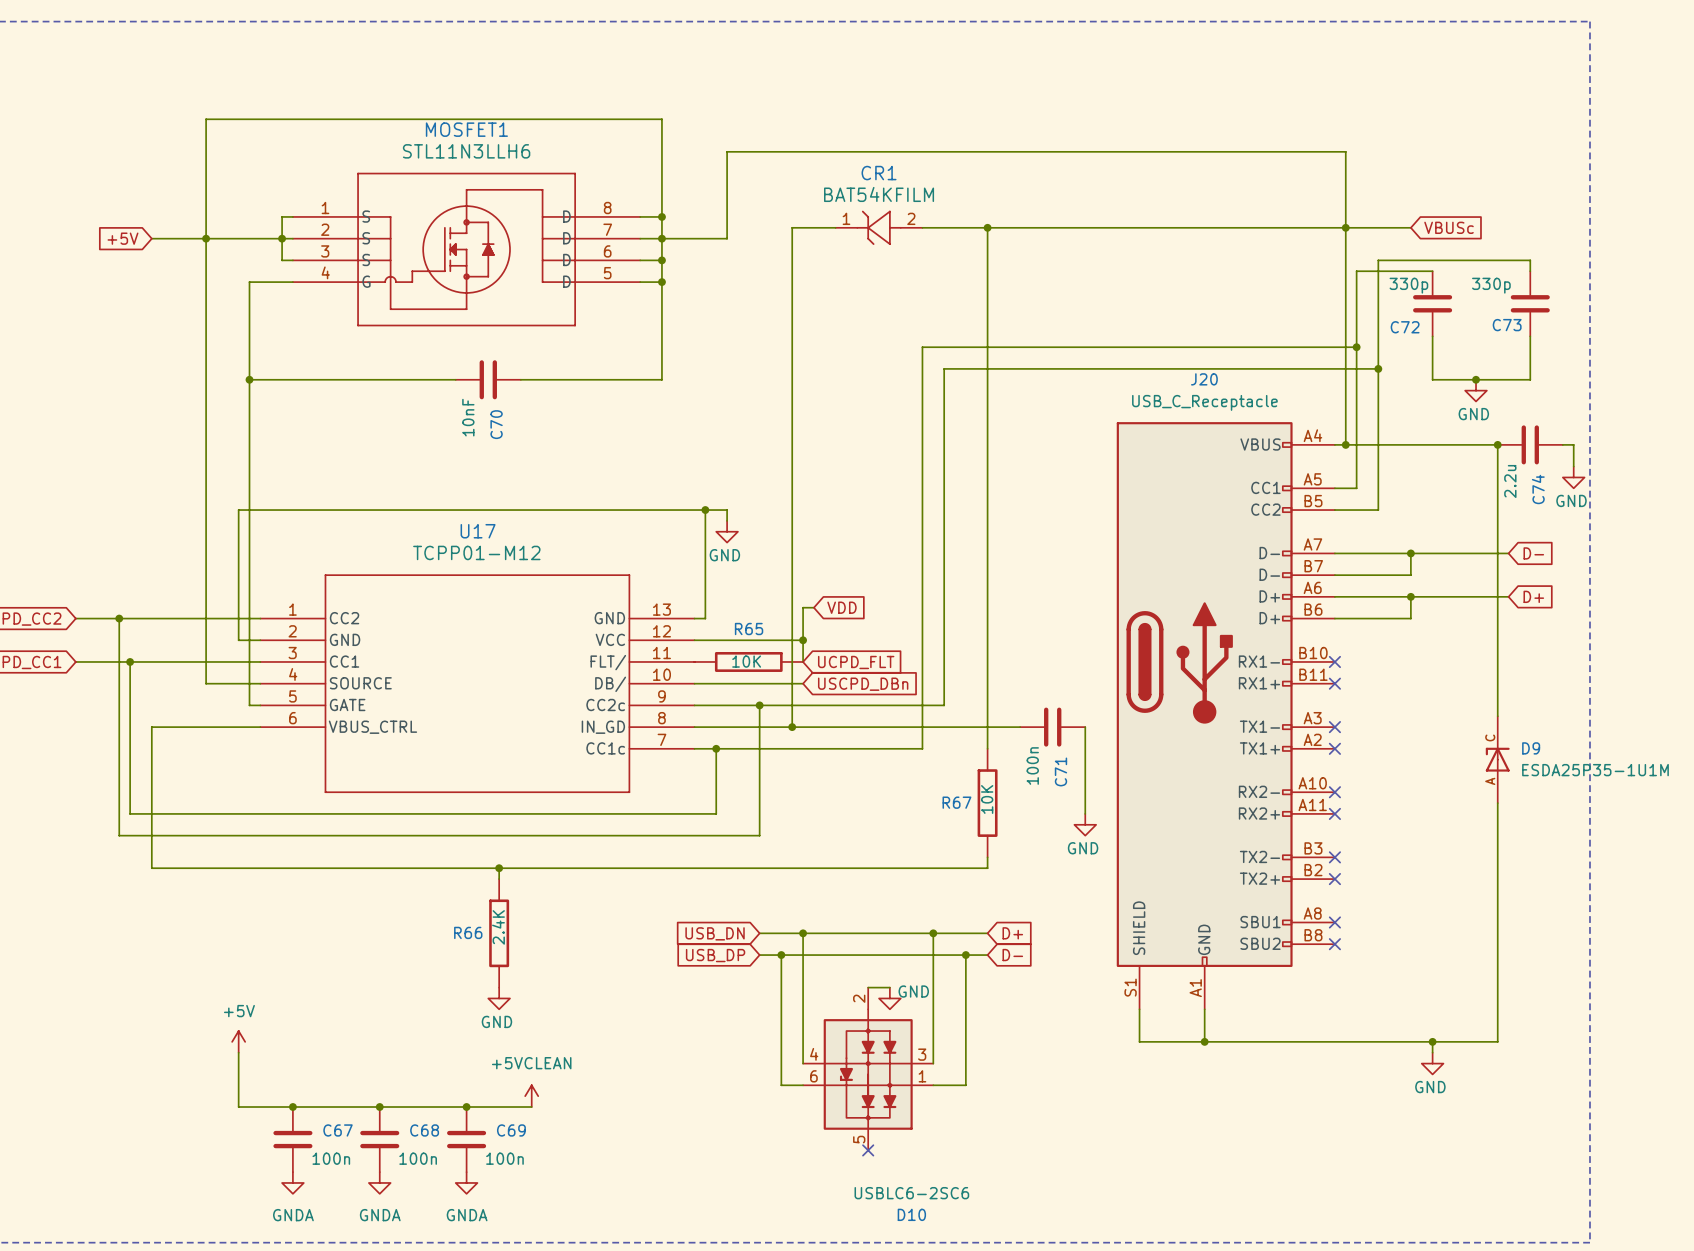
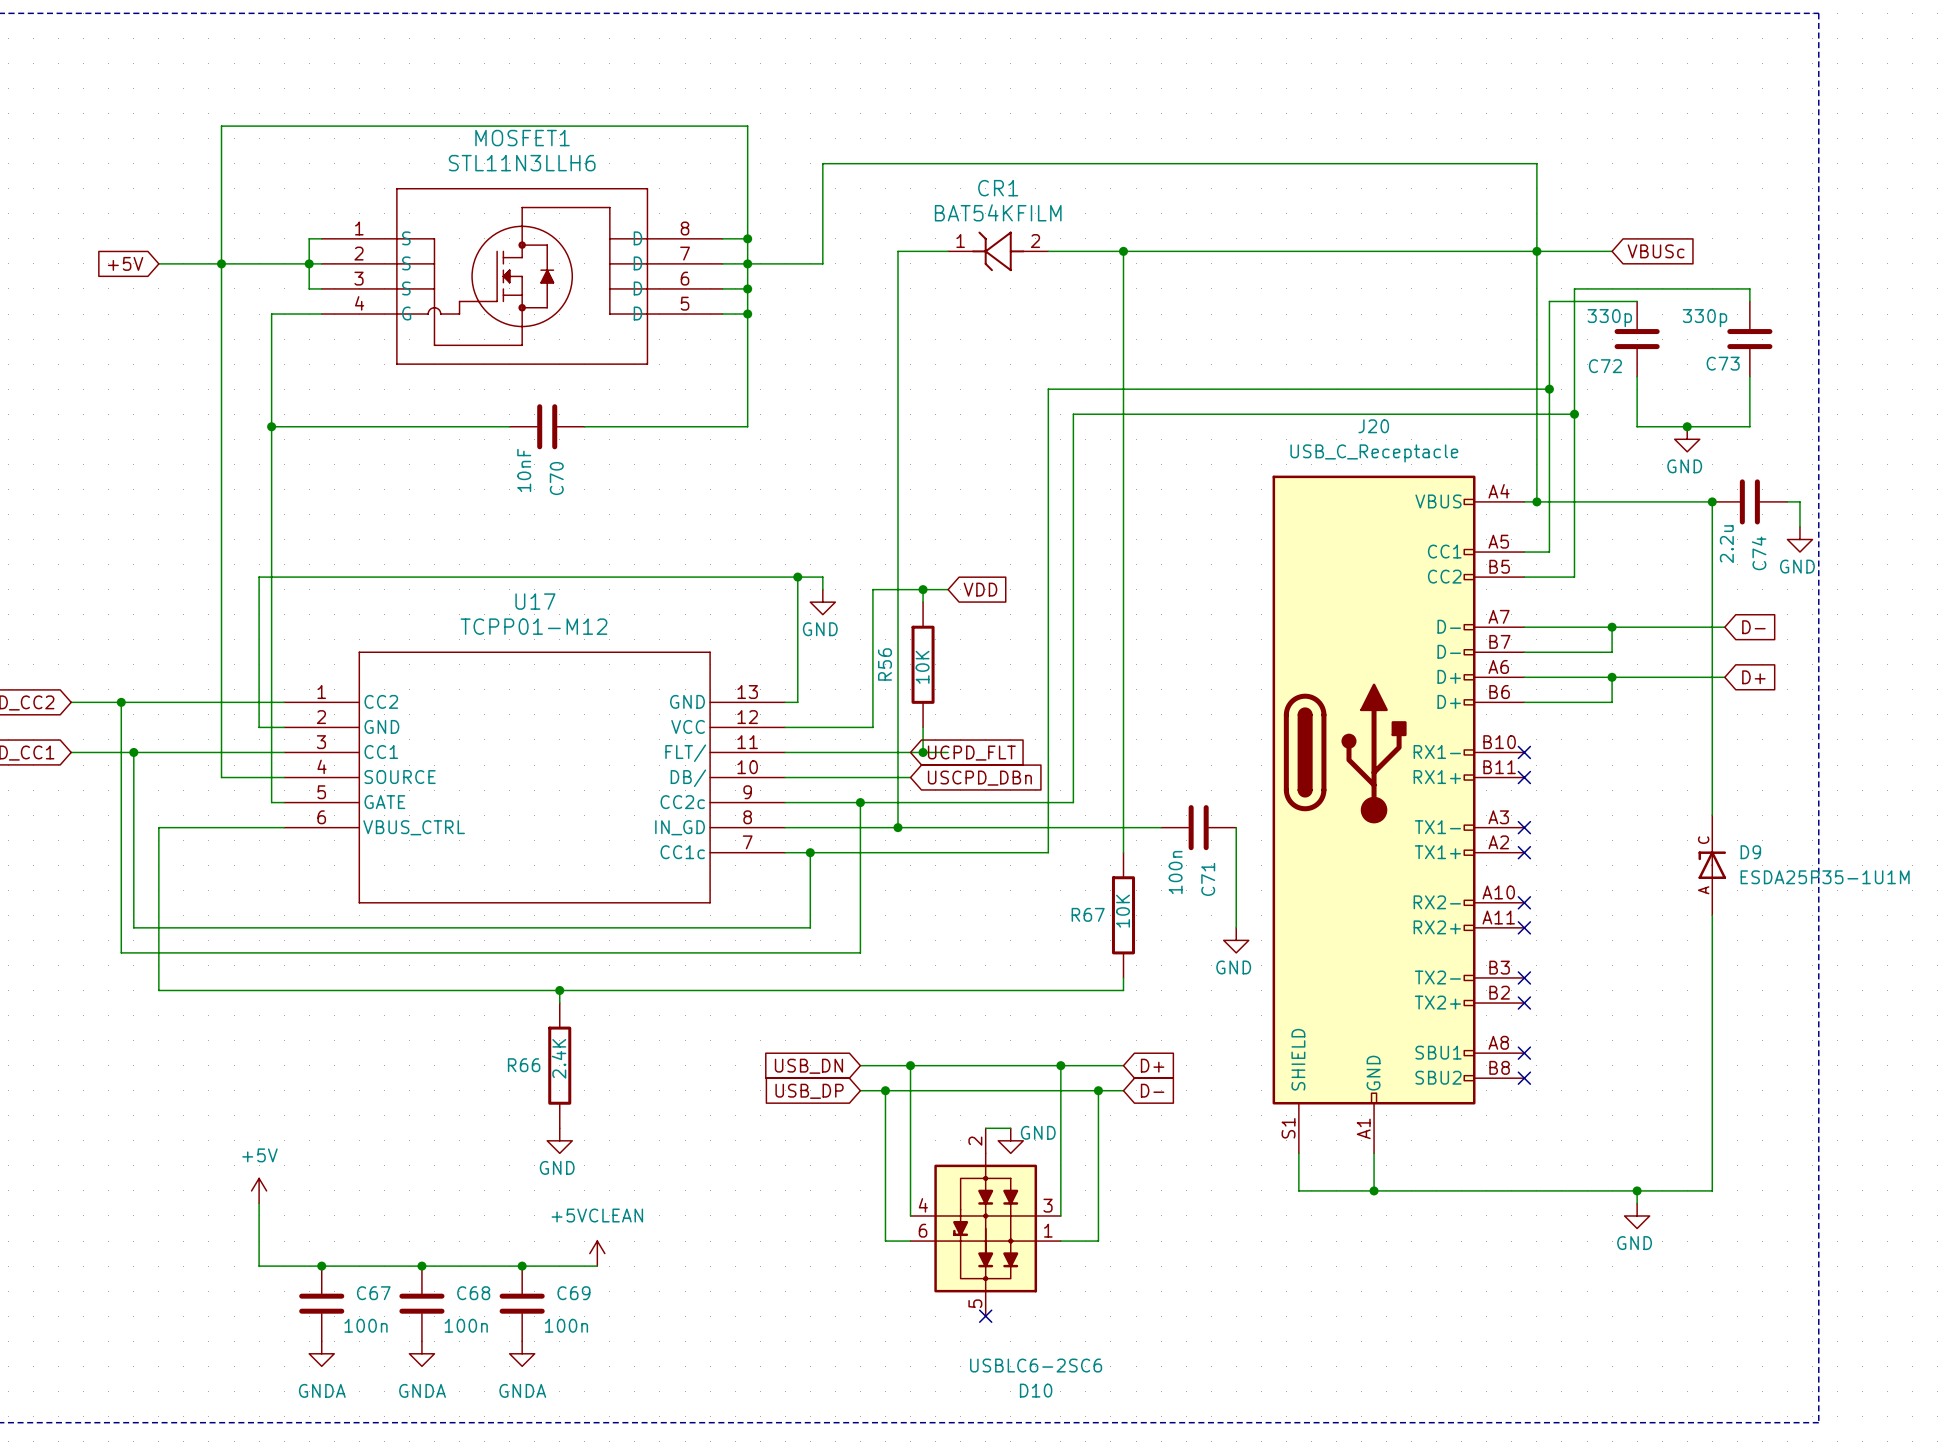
wire: none -> (923, 589) (923, 602)
junction: none -> (923, 589)
R56: none -> 10K (923, 664)
wire: (813, 607) (803, 607) (803, 661) -> none
global label position: VDD (841, 607) -> VDD (980, 589)
wire: (770, 640) (803, 640) -> (872, 727) (872, 589) (948, 589)
junction position: (803, 640) -> (923, 752)
wire: none -> (923, 727) (923, 752)
wire: none -> (785, 752) (948, 752)
R65: 10K (748, 661) -> none

